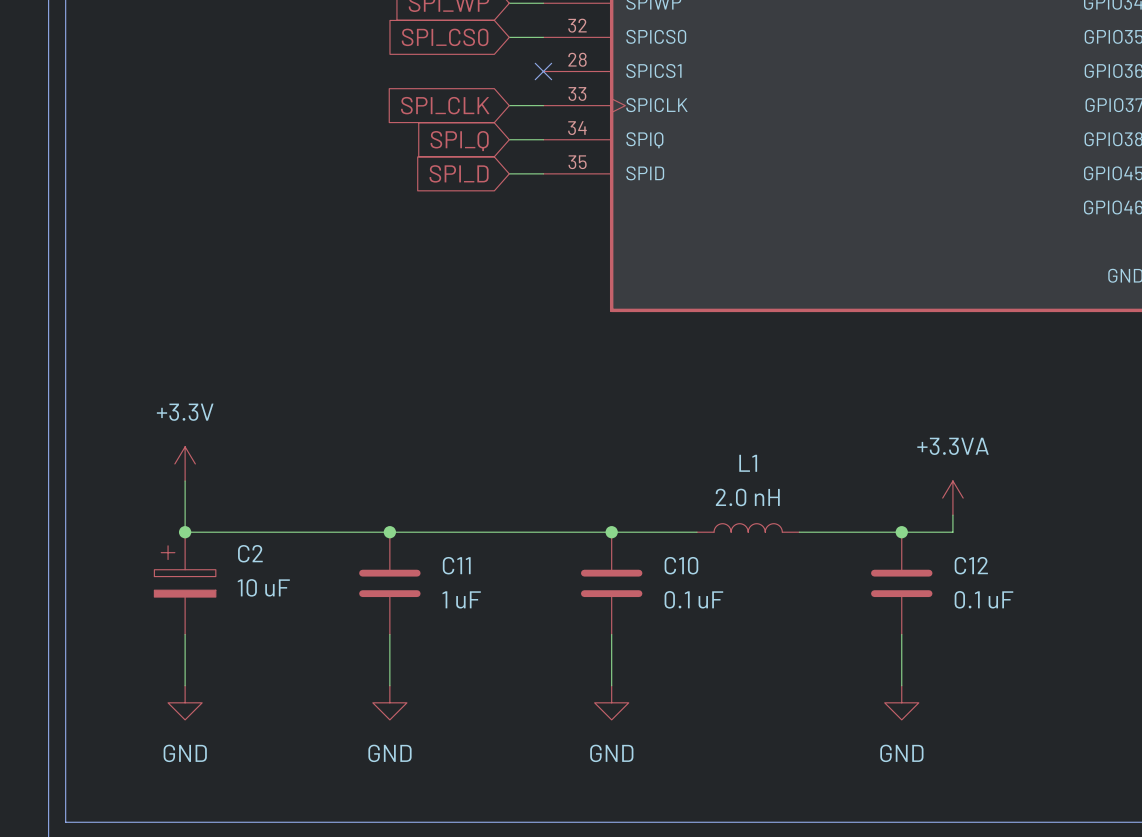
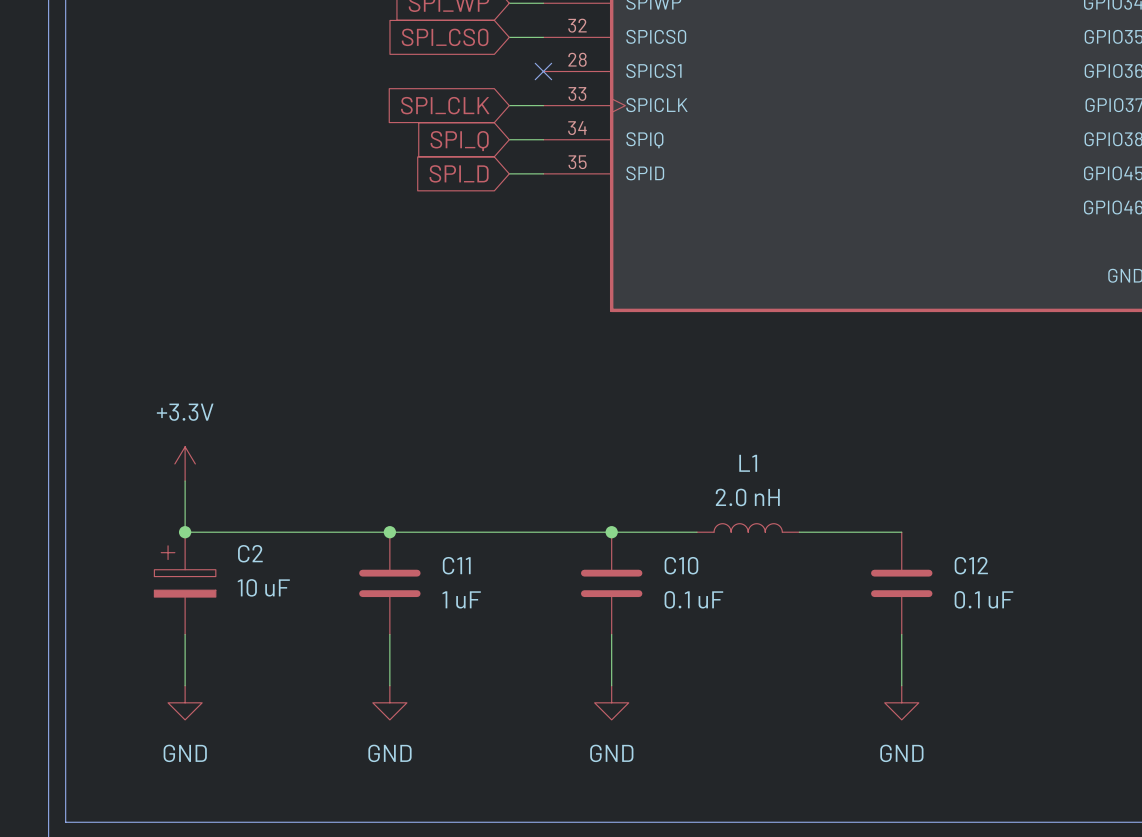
power symbol: +3.3VA (952, 498) -> none
wire: (952, 515) (952, 532) (901, 532) -> none
junction: (901, 532) -> none

